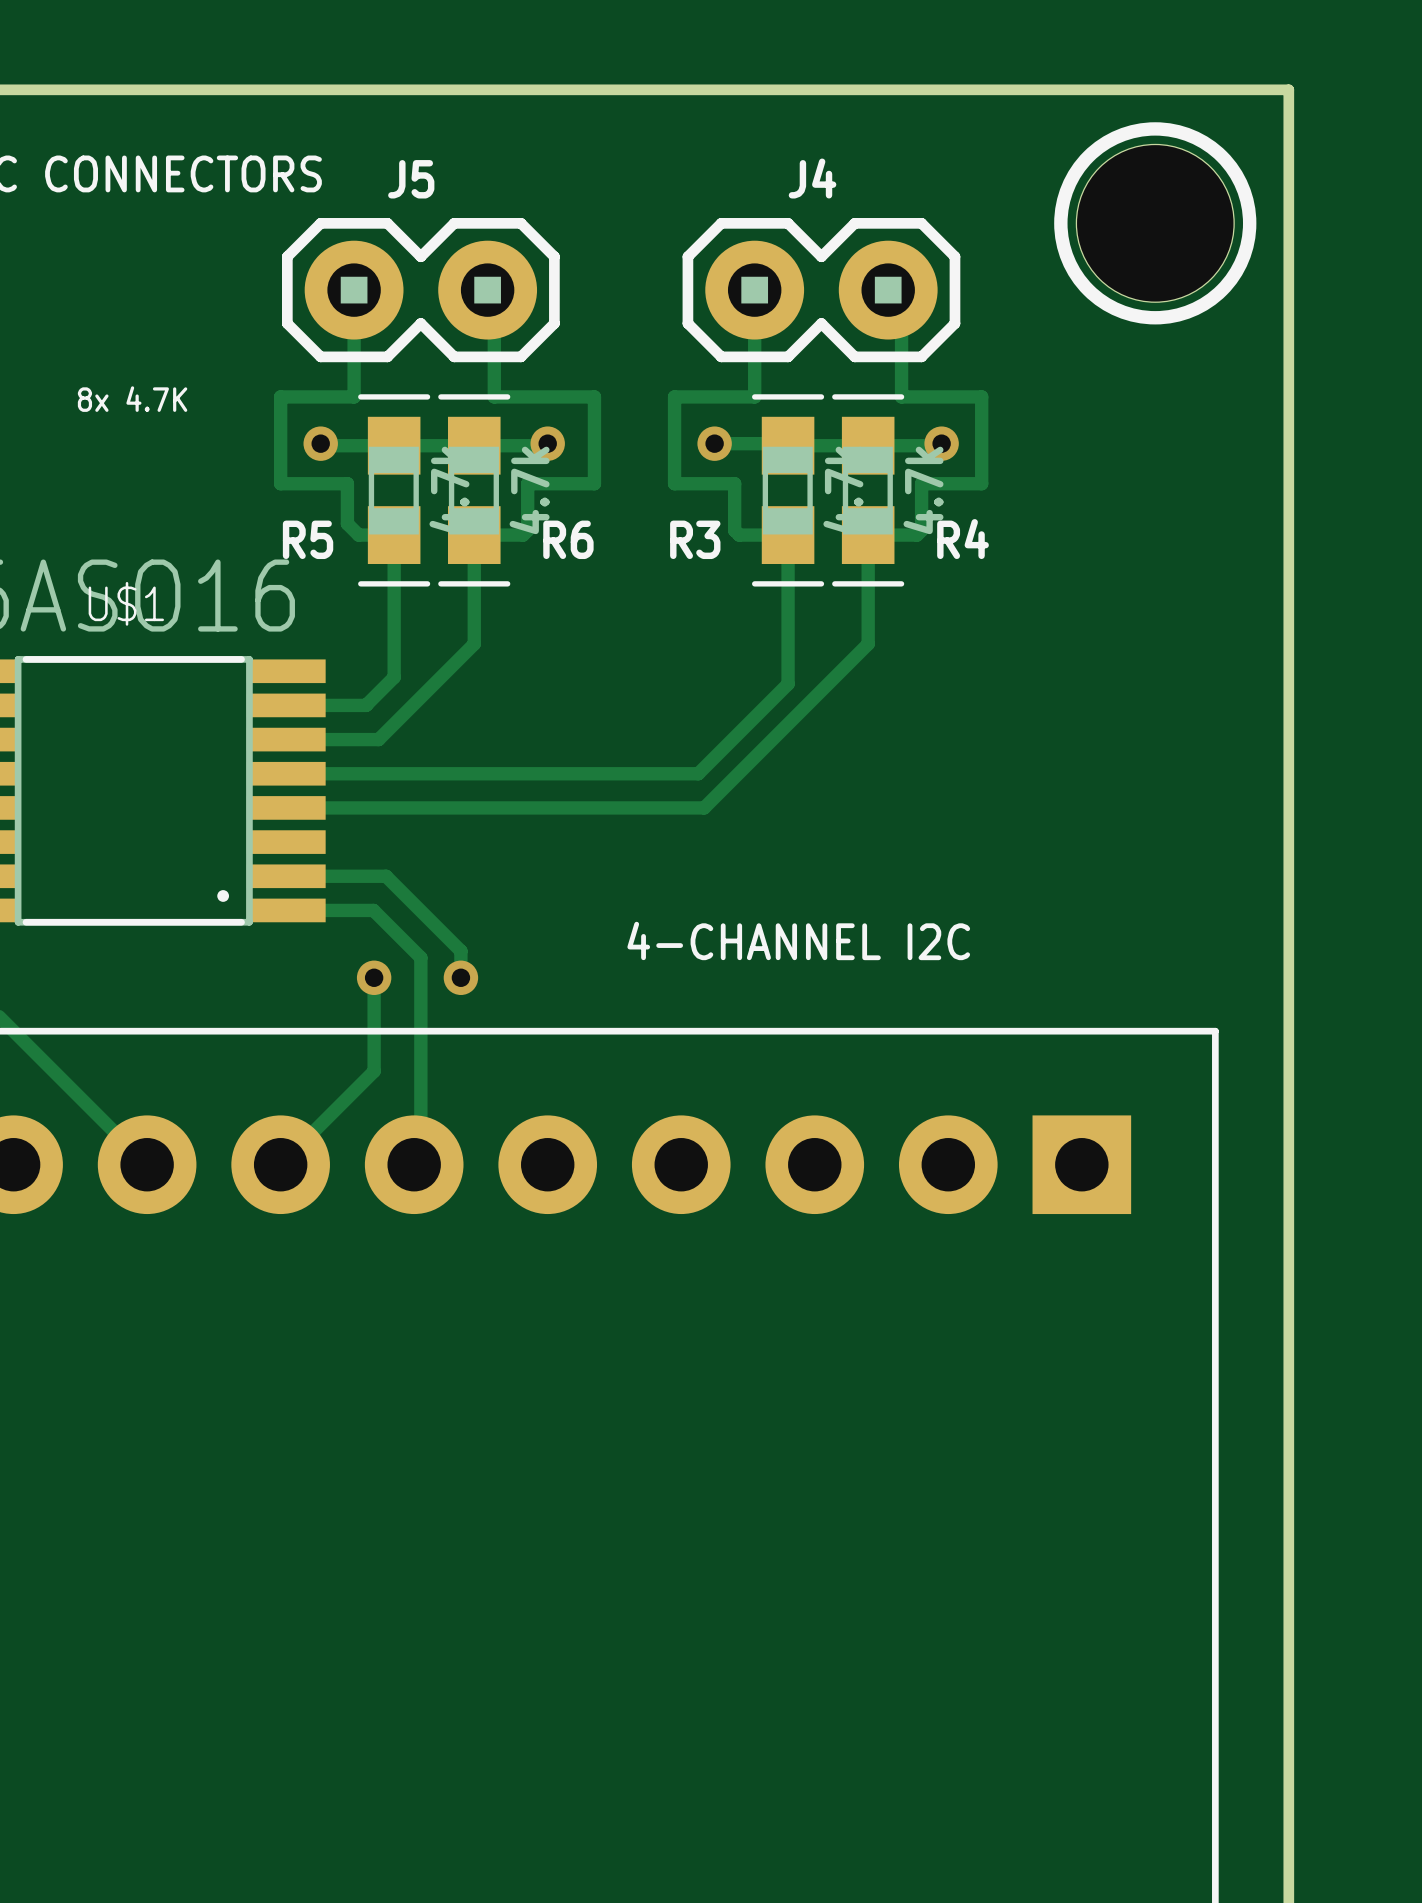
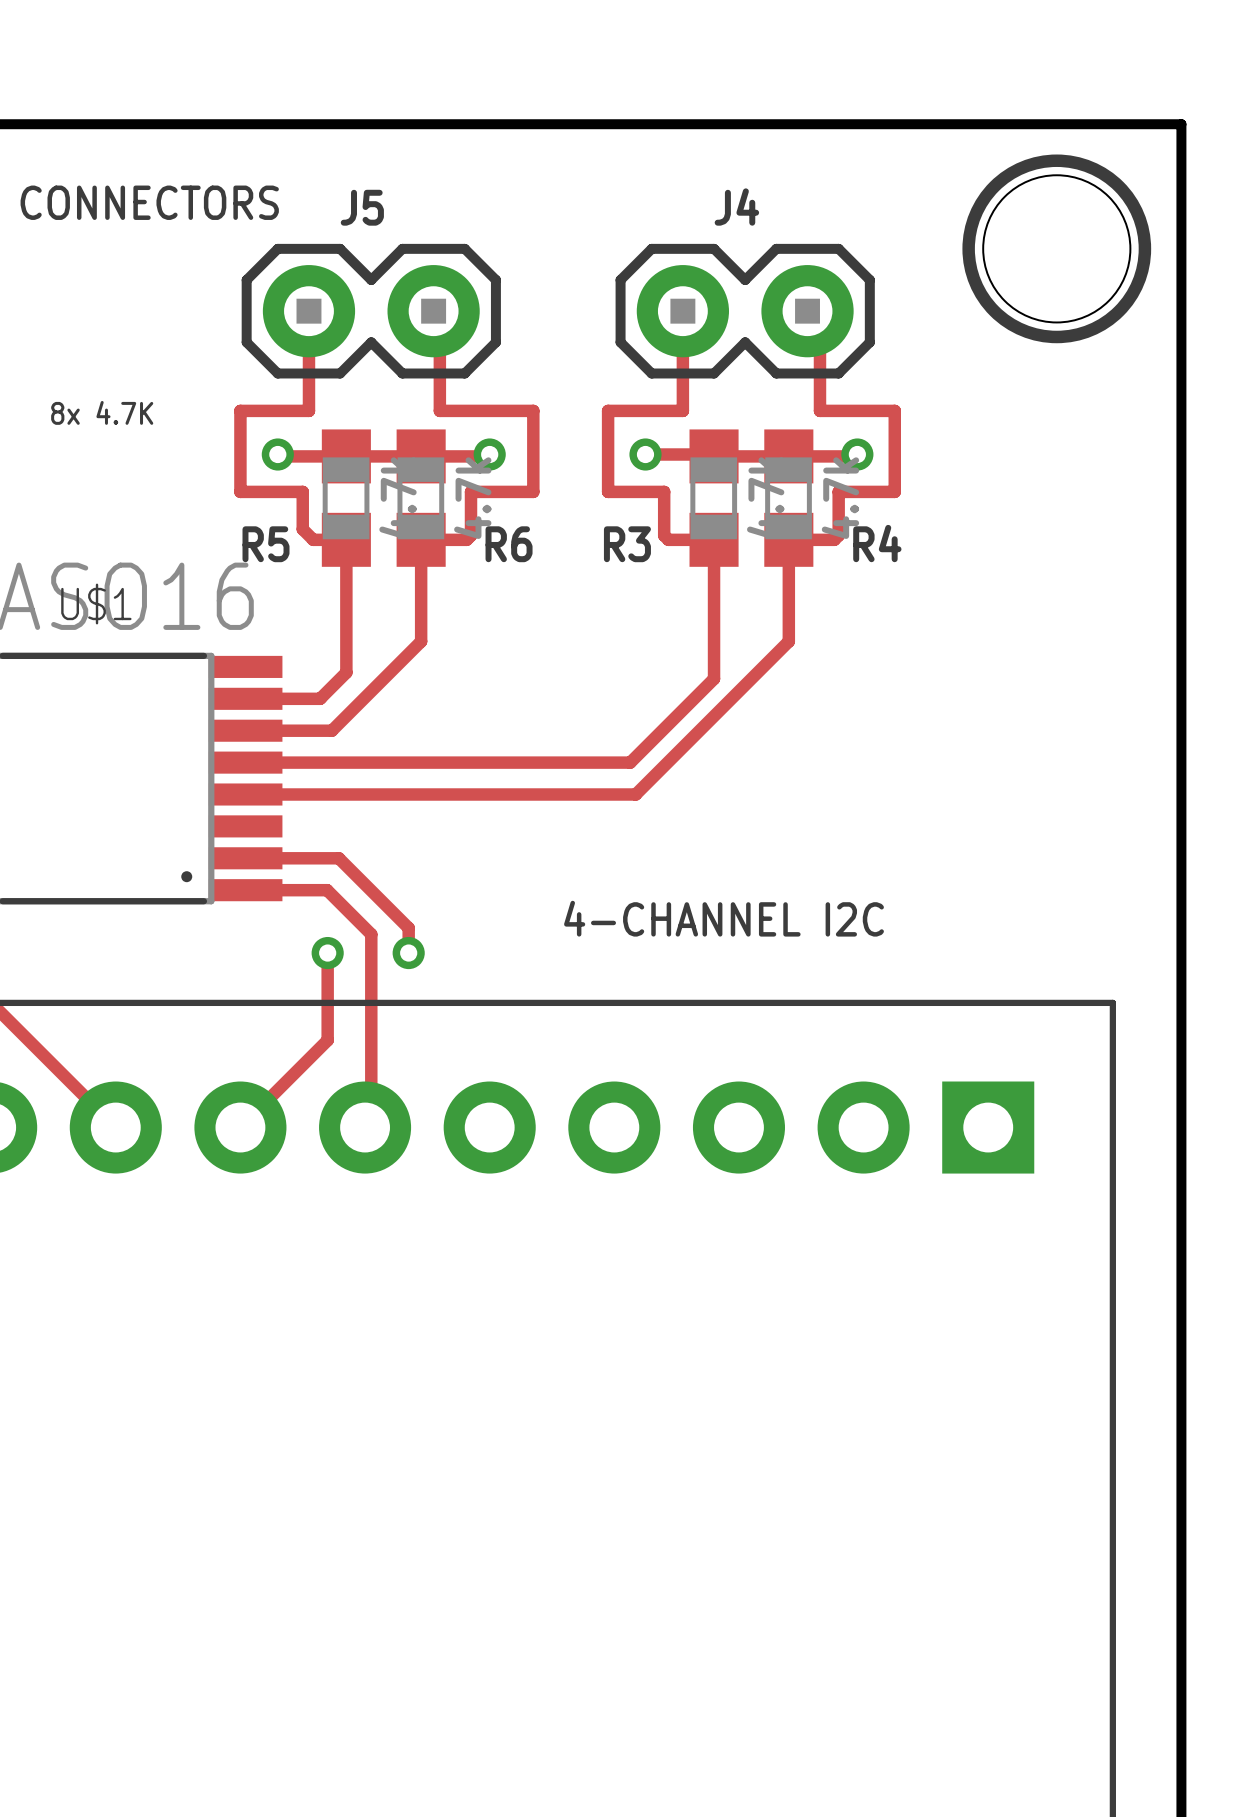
line: (360, 396) (427, 396) -> none
line: (440, 396) (507, 396) -> none
line: (754, 396) (821, 396) -> none
line: (834, 396) (901, 396) -> none
line: (360, 583) (427, 583) -> none
line: (440, 583) (507, 583) -> none
line: (754, 583) (821, 583) -> none
line: (834, 583) (901, 583) -> none

